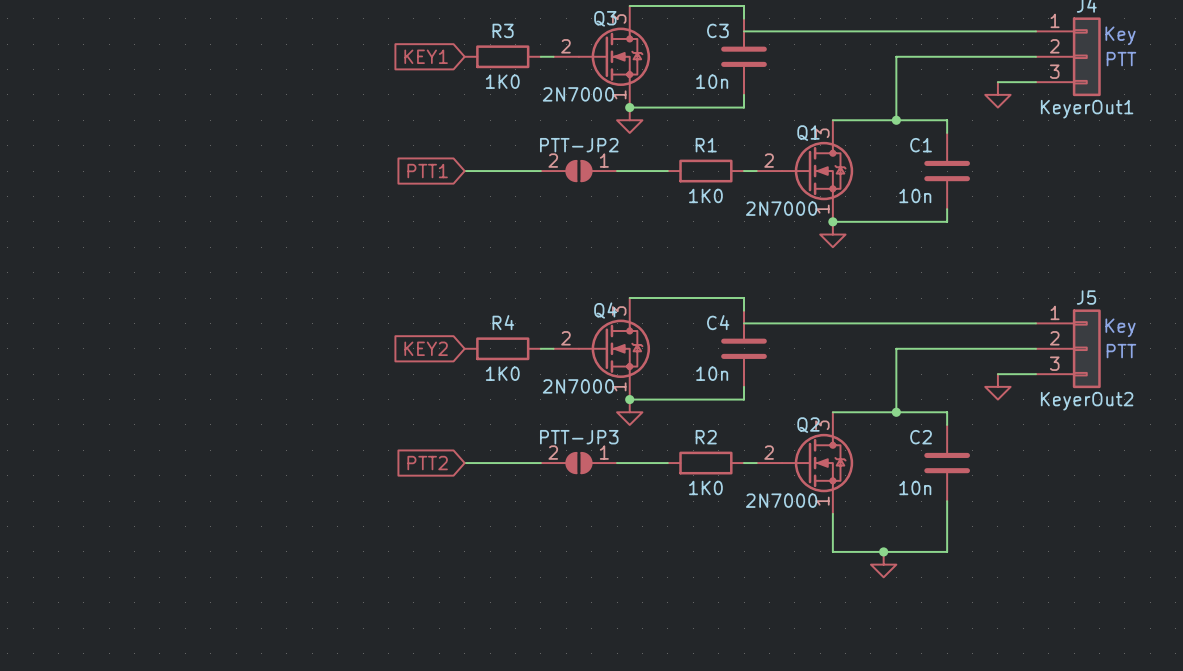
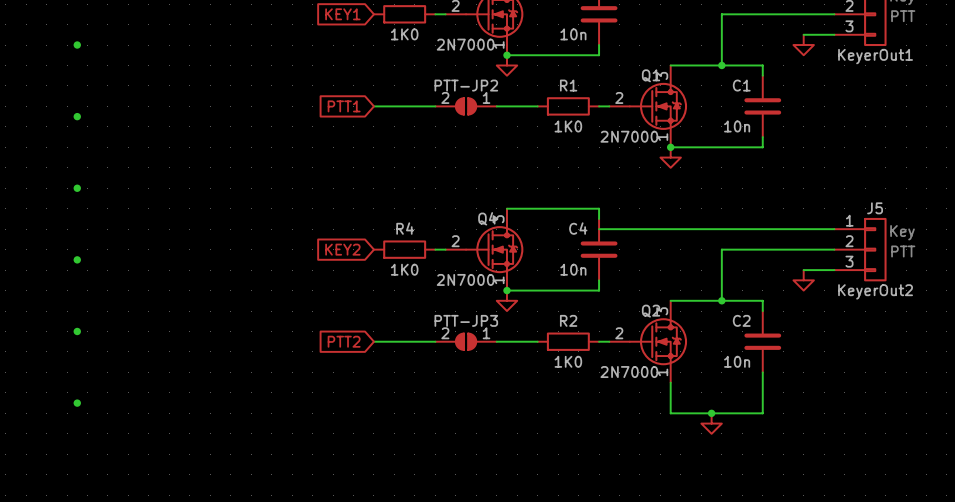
junction: none -> (77, 45)
junction: none -> (77, 116)
junction: none -> (77, 188)
junction: none -> (77, 259)
junction: none -> (77, 331)
junction: none -> (77, 403)

